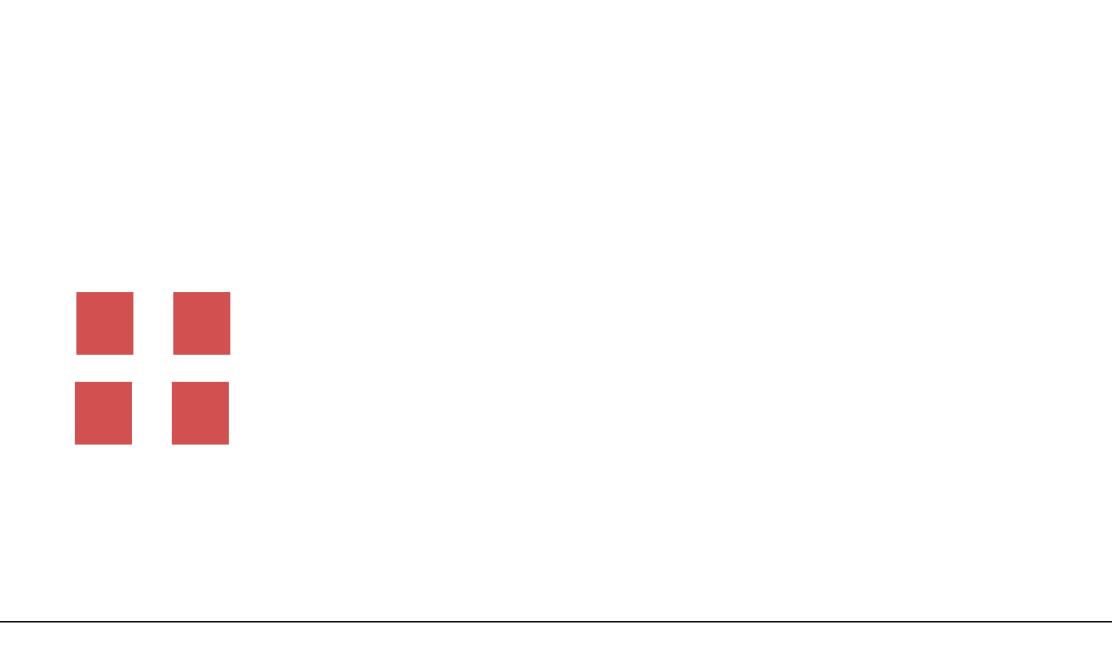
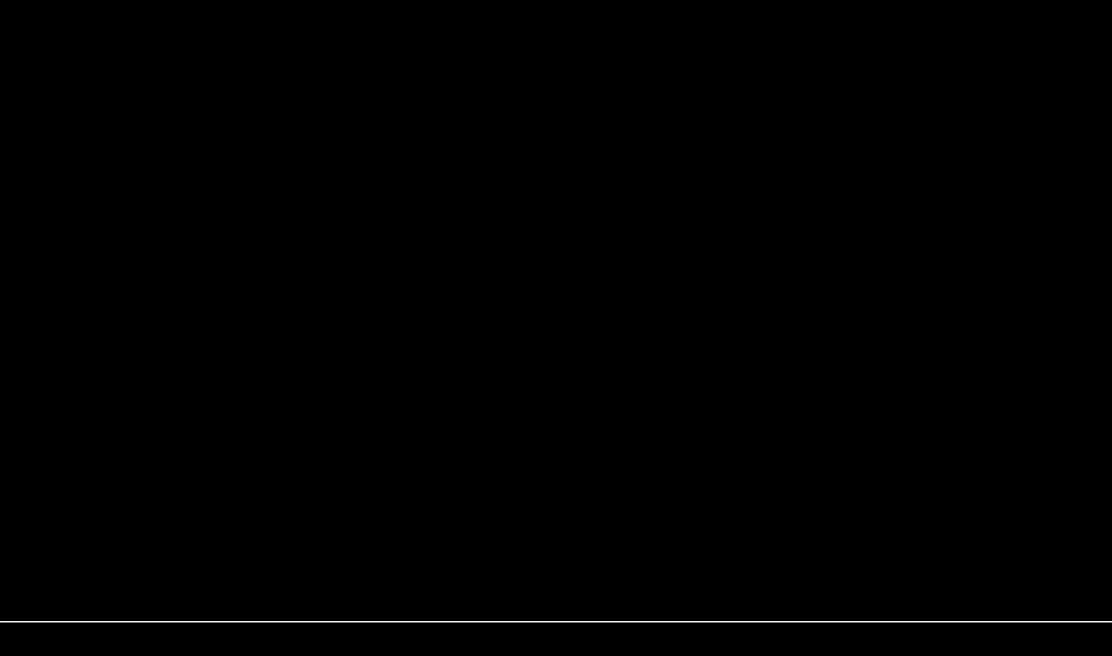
part: (153, 323) -> none
part: (151, 413) -> none

